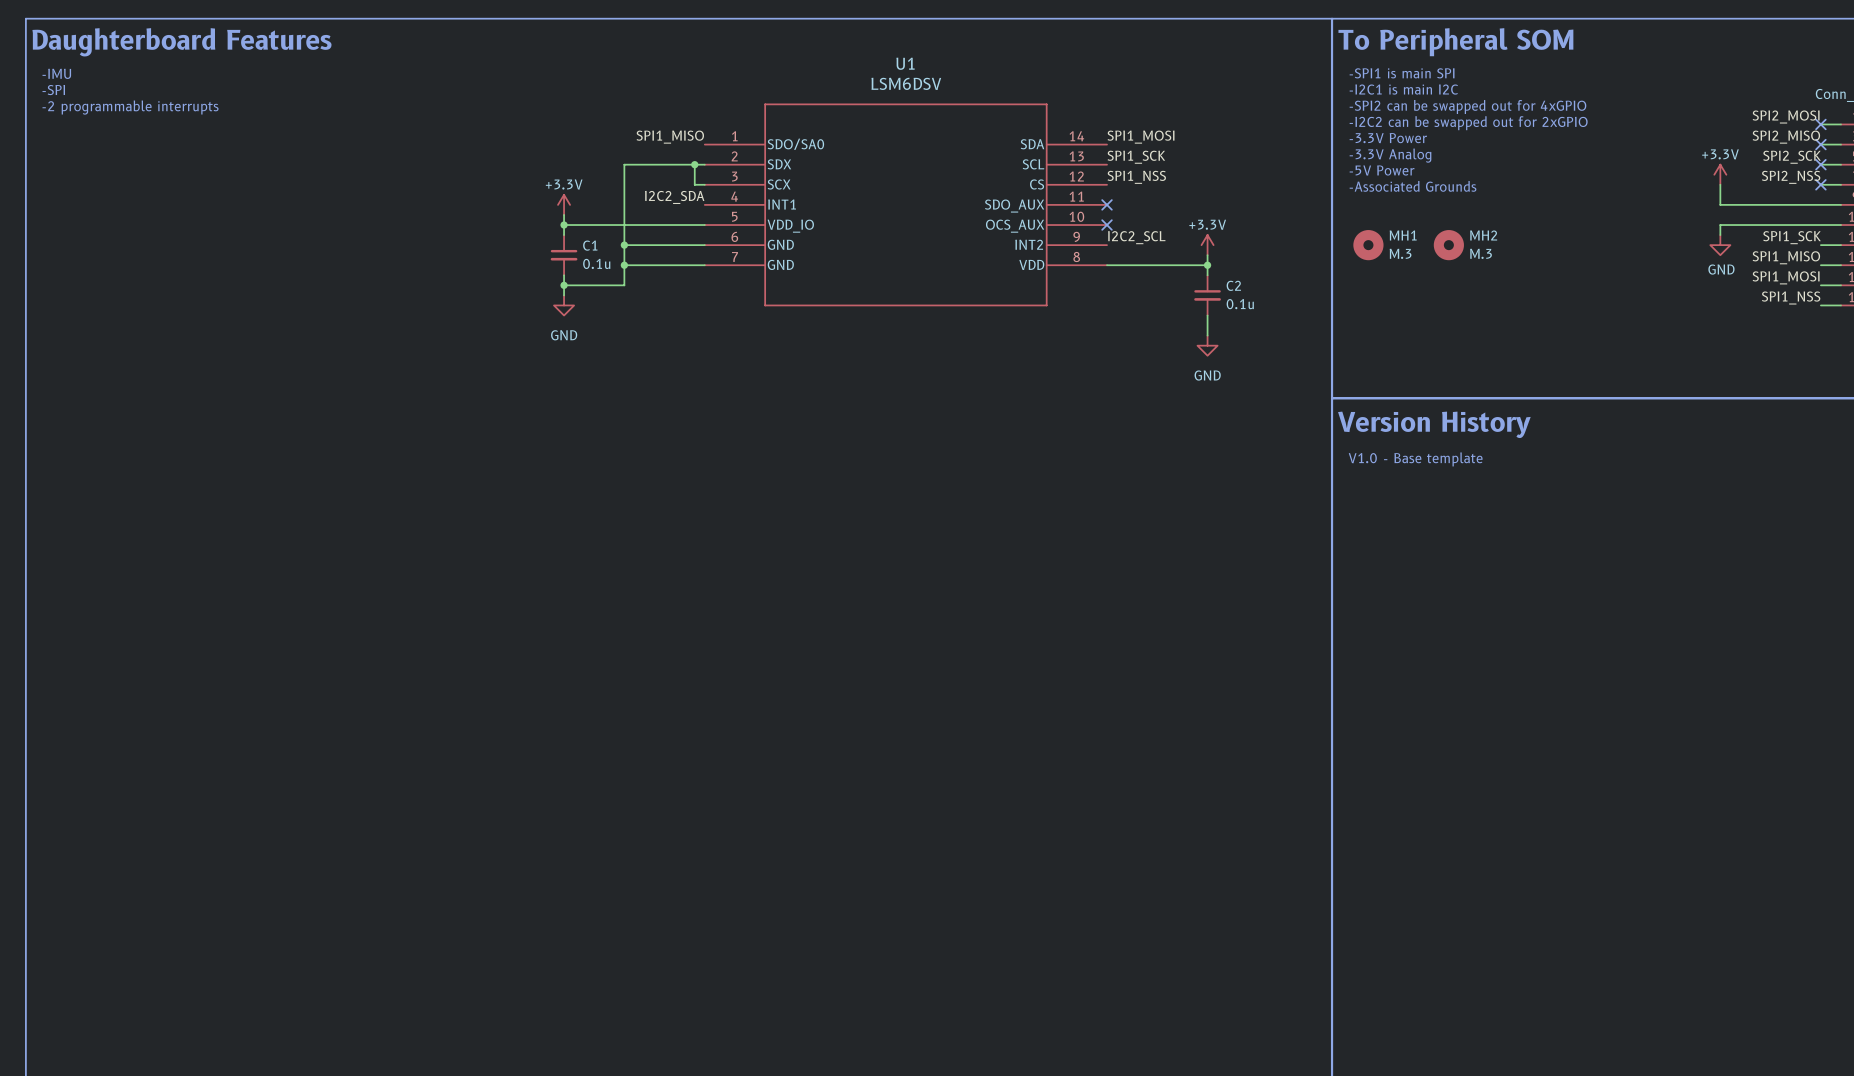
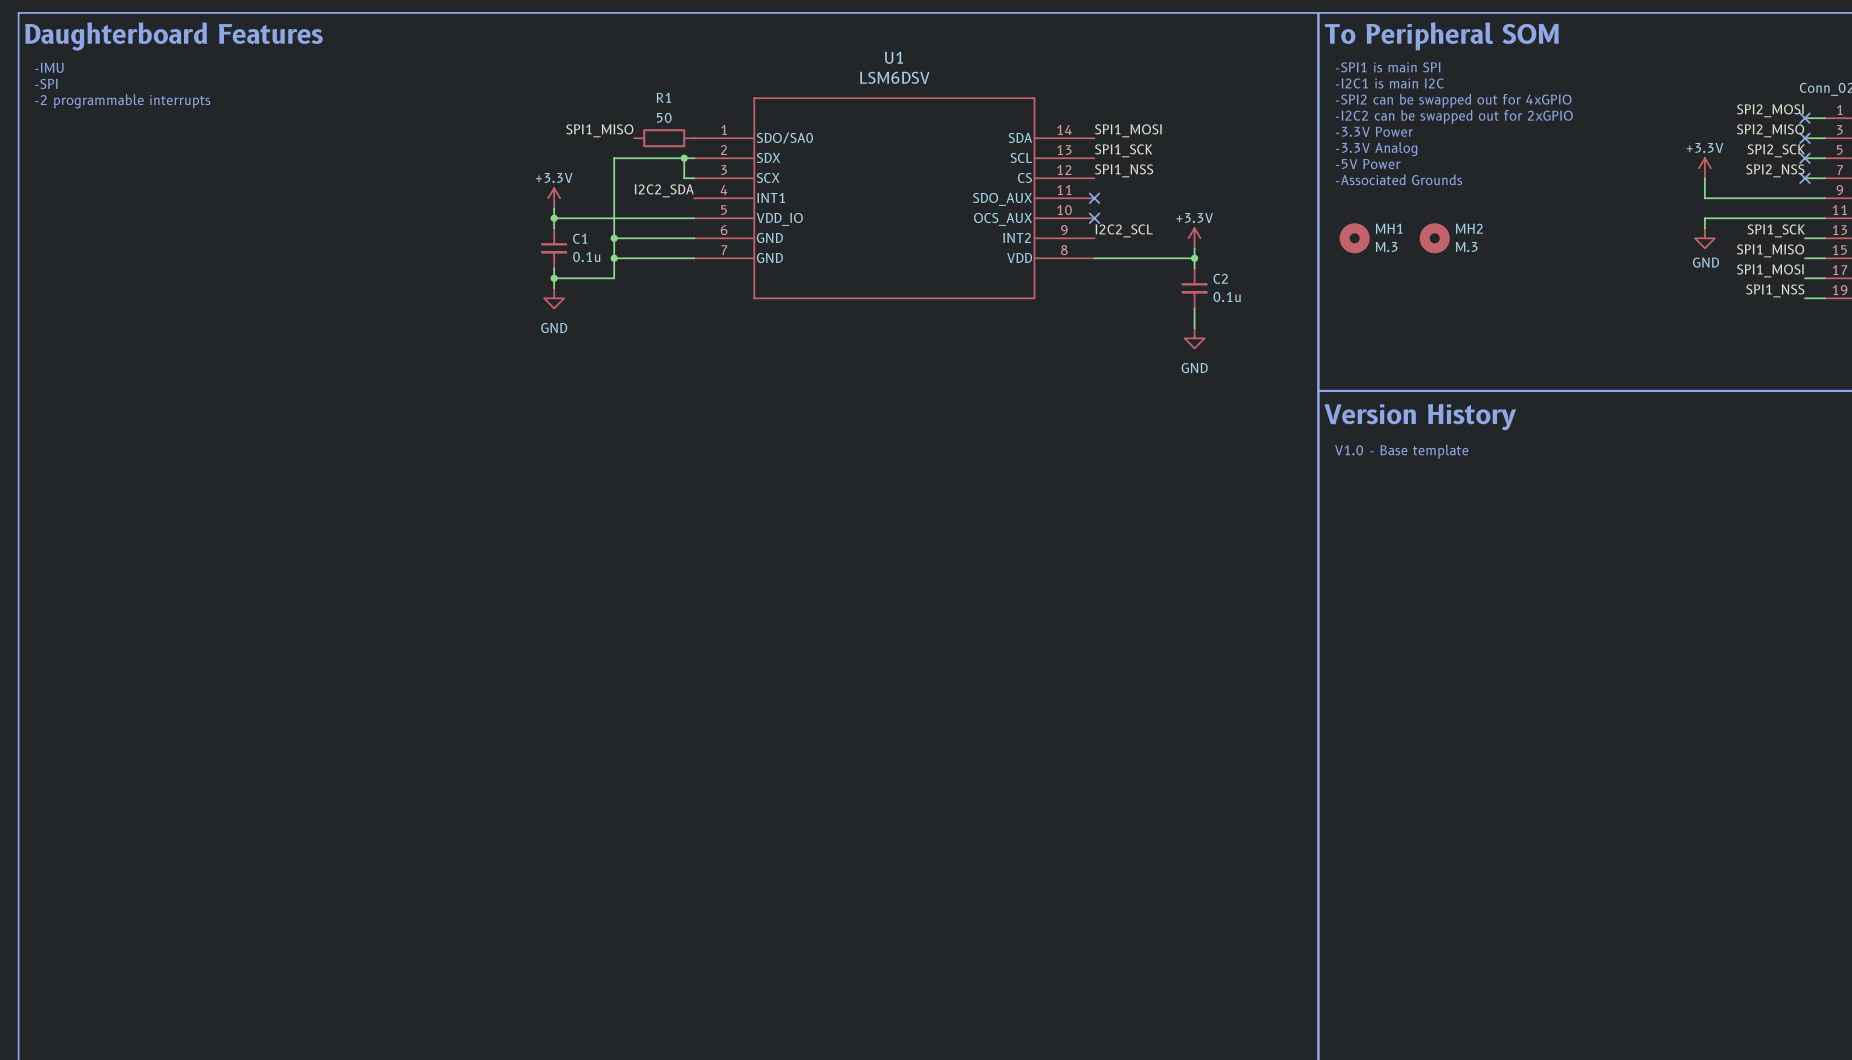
label position: SPI1_MISO (670, 137) -> SPI1_MISO (599, 130)
R1: none -> 50 (664, 138)

